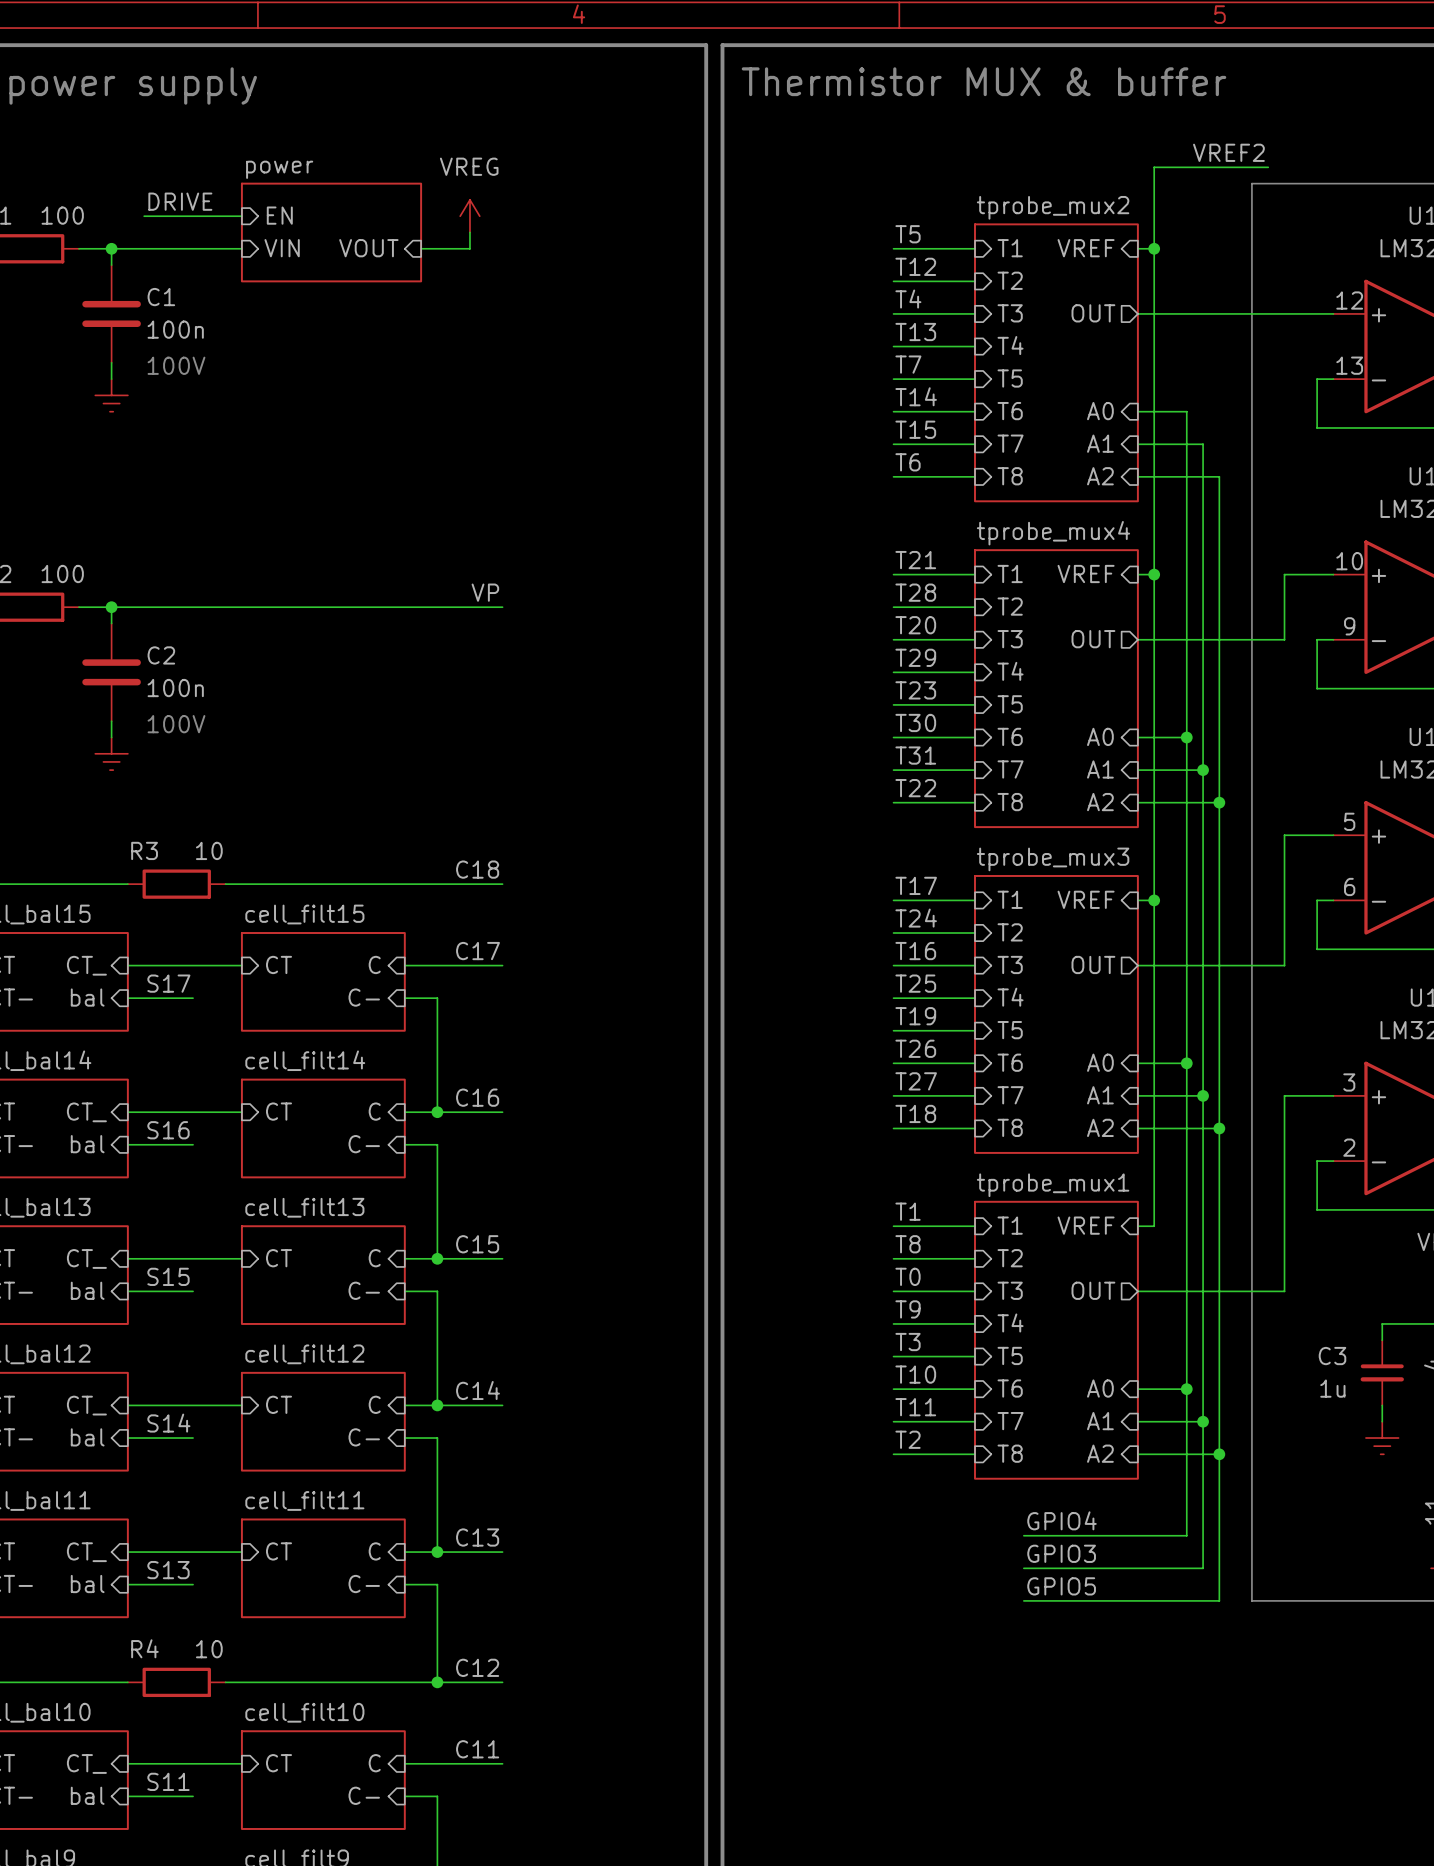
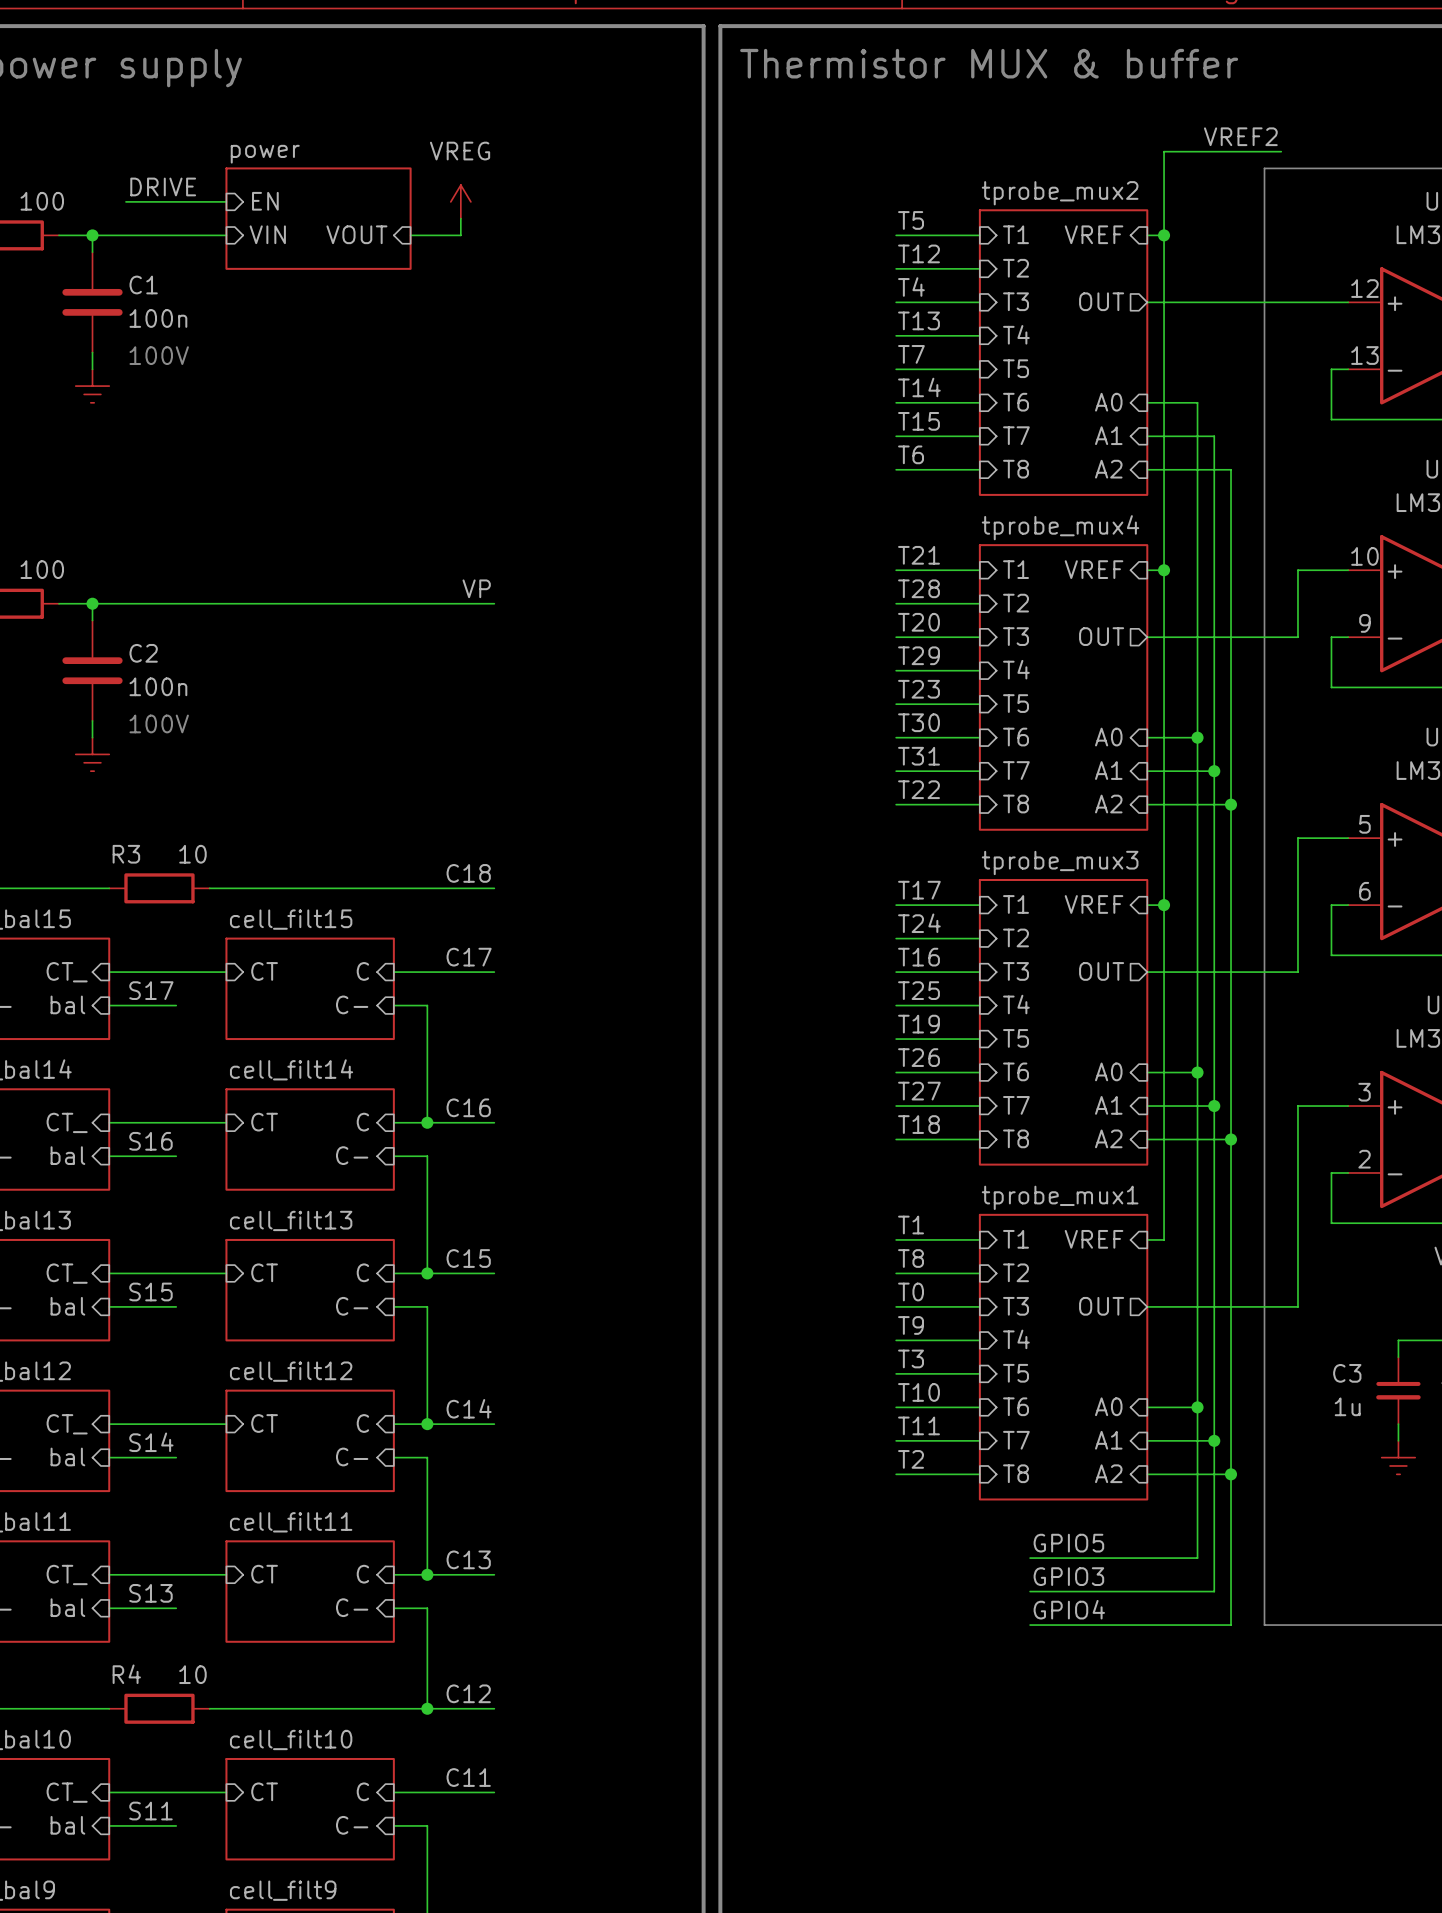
label: GPIO4 (1062, 1520) -> GPIO5 (1068, 1543)
label: GPIO5 (1061, 1586) -> GPIO4 (1069, 1609)

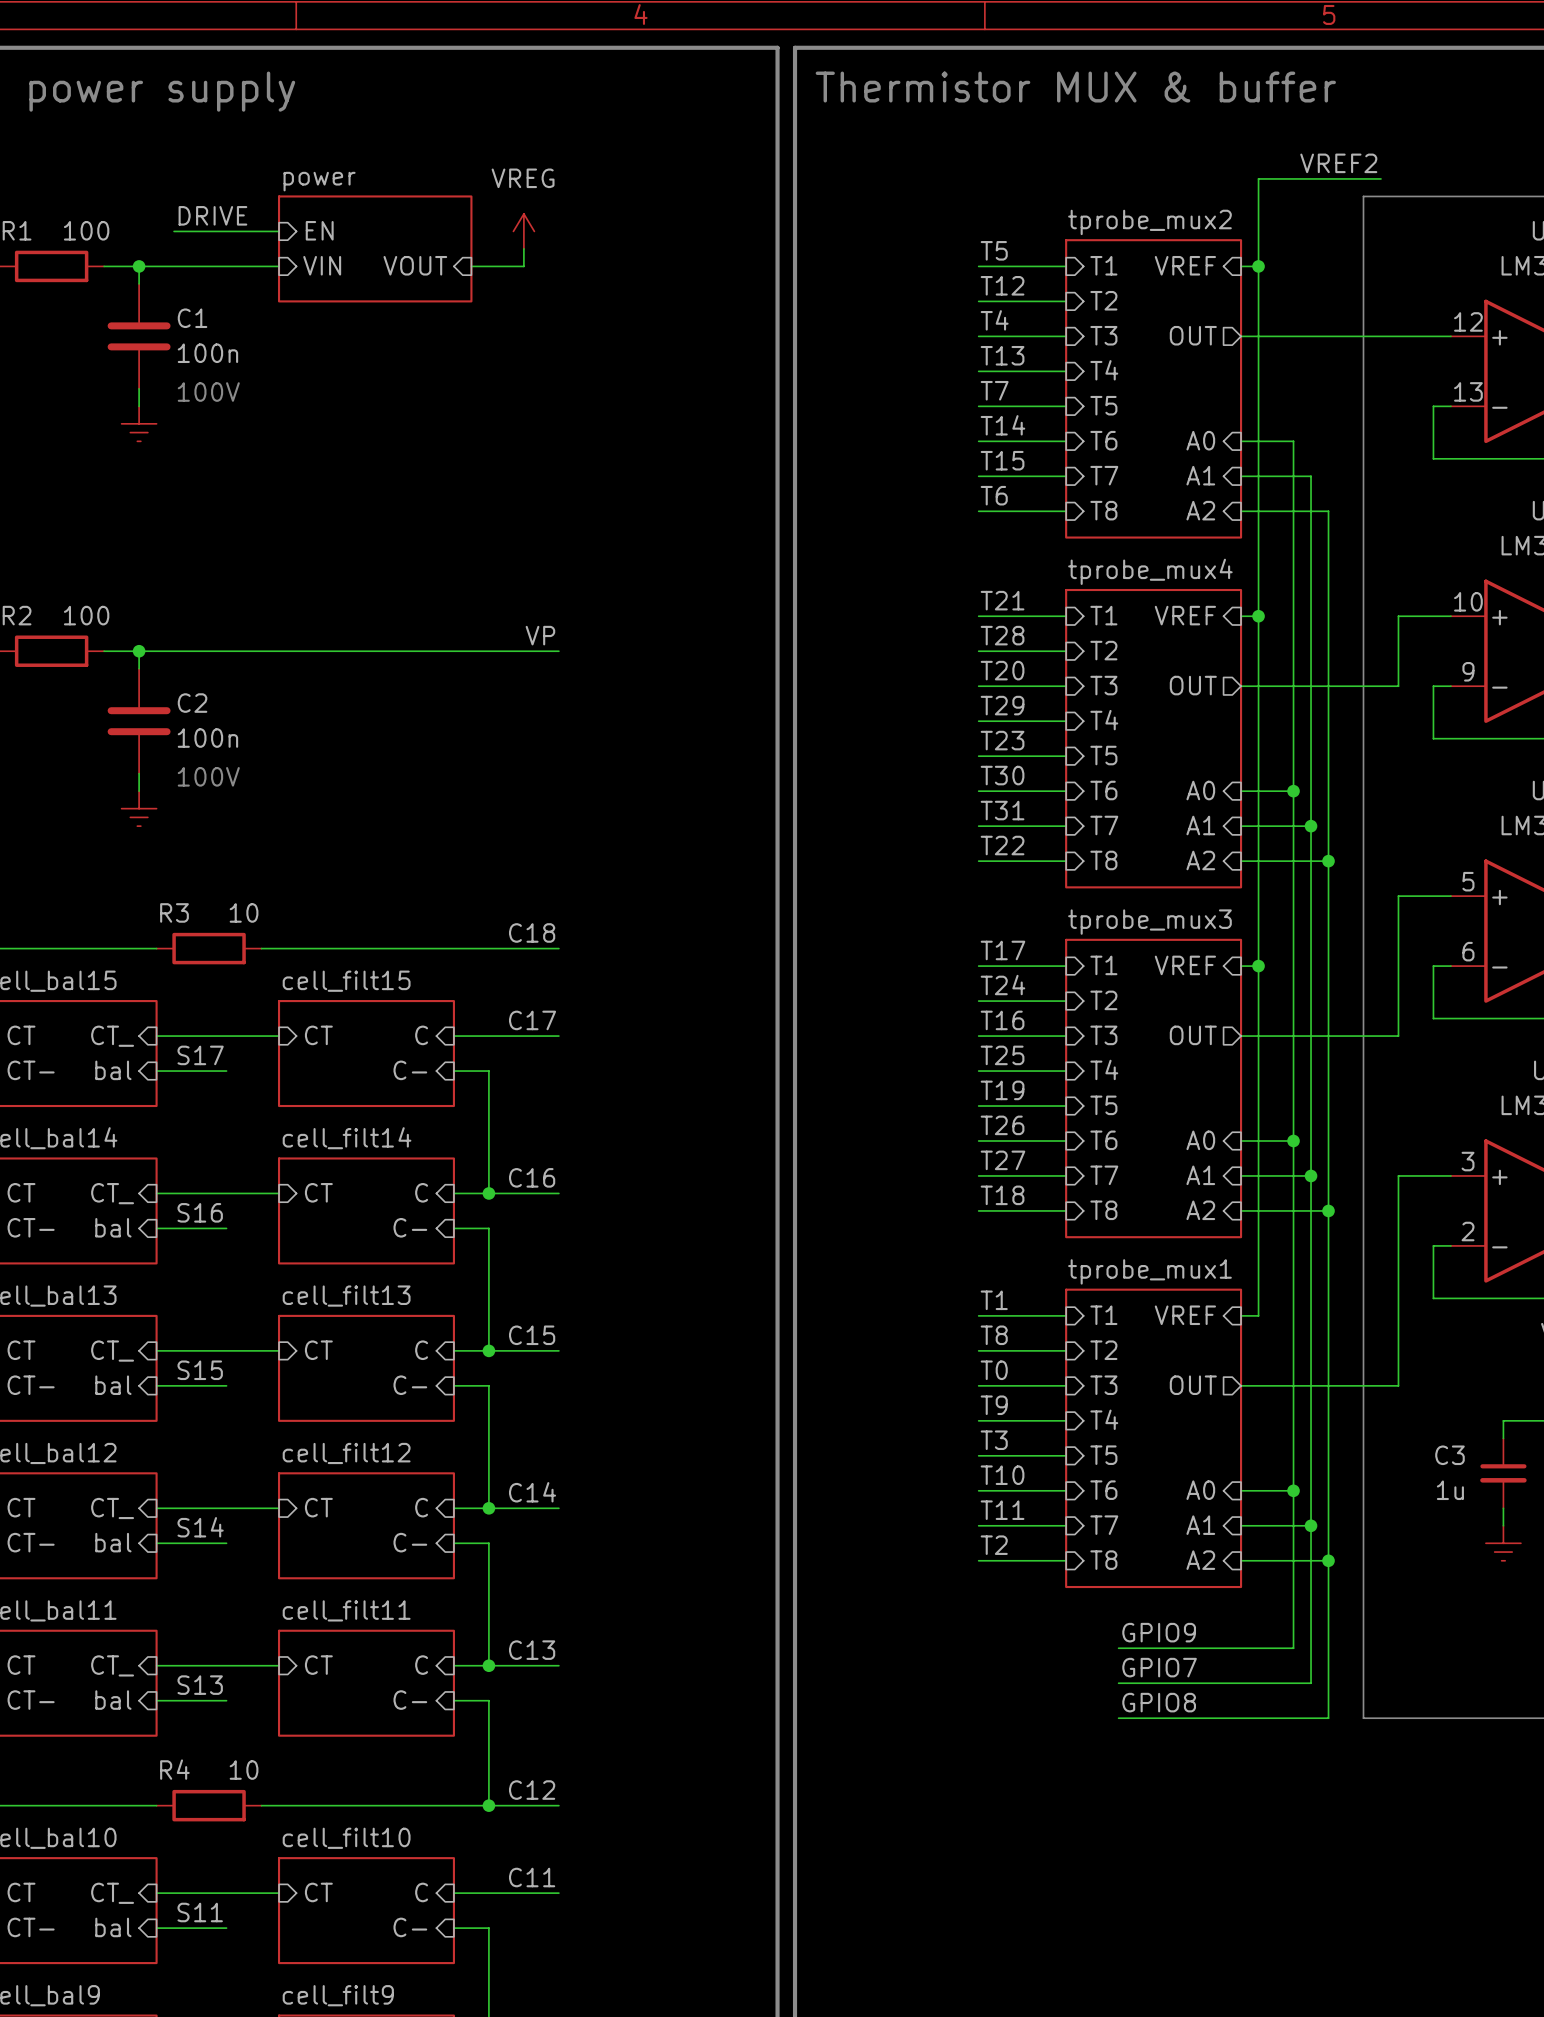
label: GPIO5 (1068, 1543) -> GPIO9 (1159, 1632)
label: GPIO3 (1068, 1576) -> GPIO7 (1159, 1667)
label: GPIO4 (1069, 1609) -> GPIO8 (1159, 1702)

